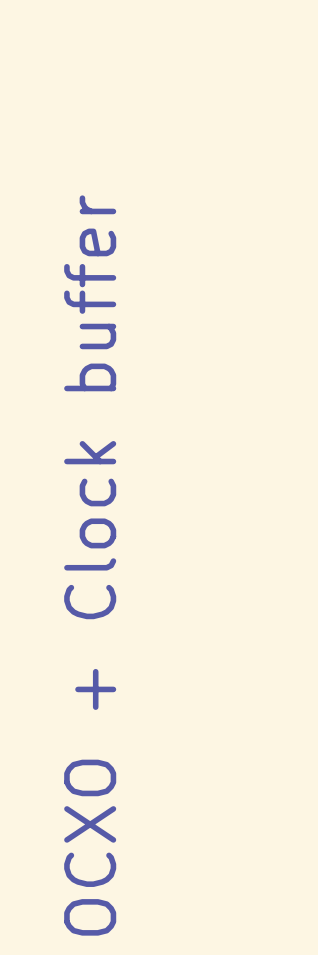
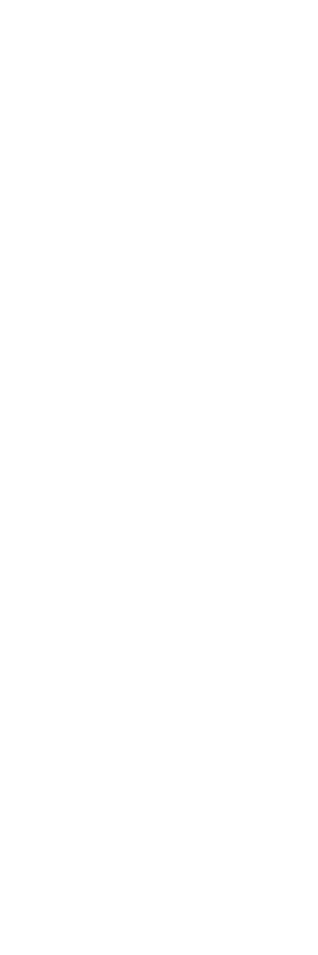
text: OCXO + Clock buffer (90, 565) -> none

